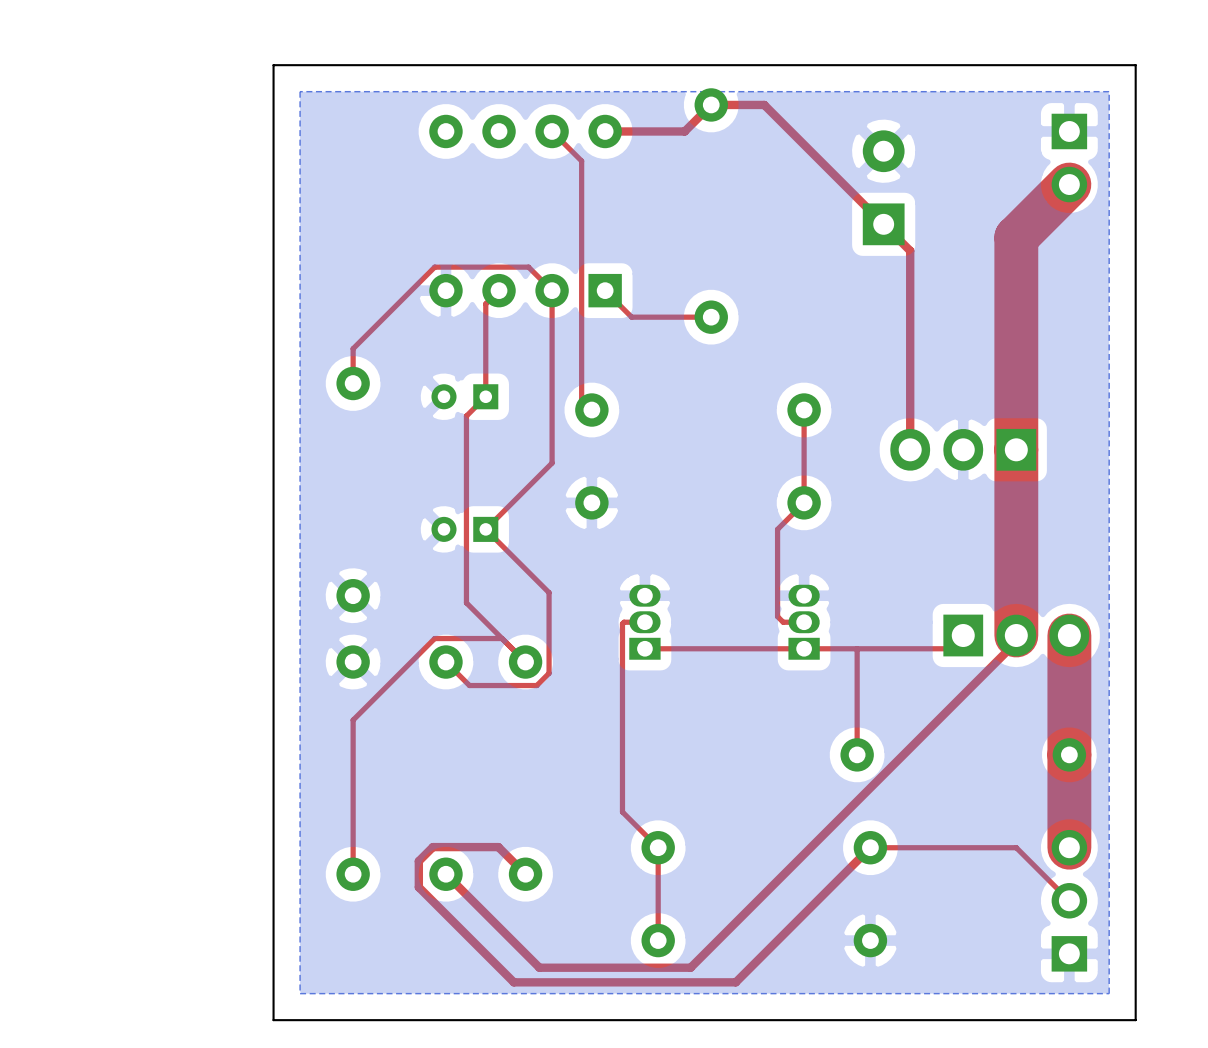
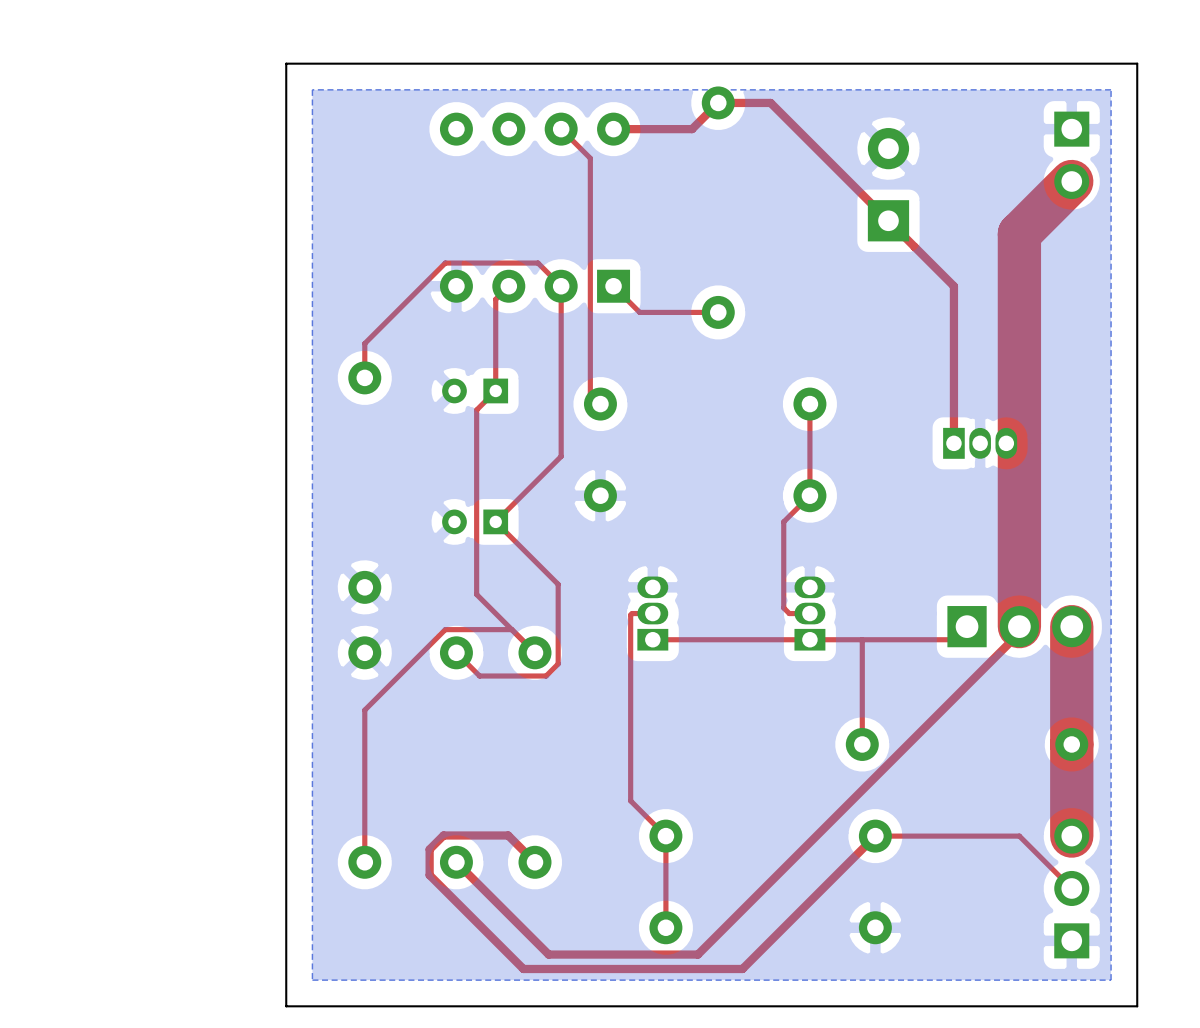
top track: (910, 250) (910, 449) -> (914, 246) (953, 286) (953, 443)
part footprint: [890, 428, 1037, 471] -> [943, 427, 1018, 459]

